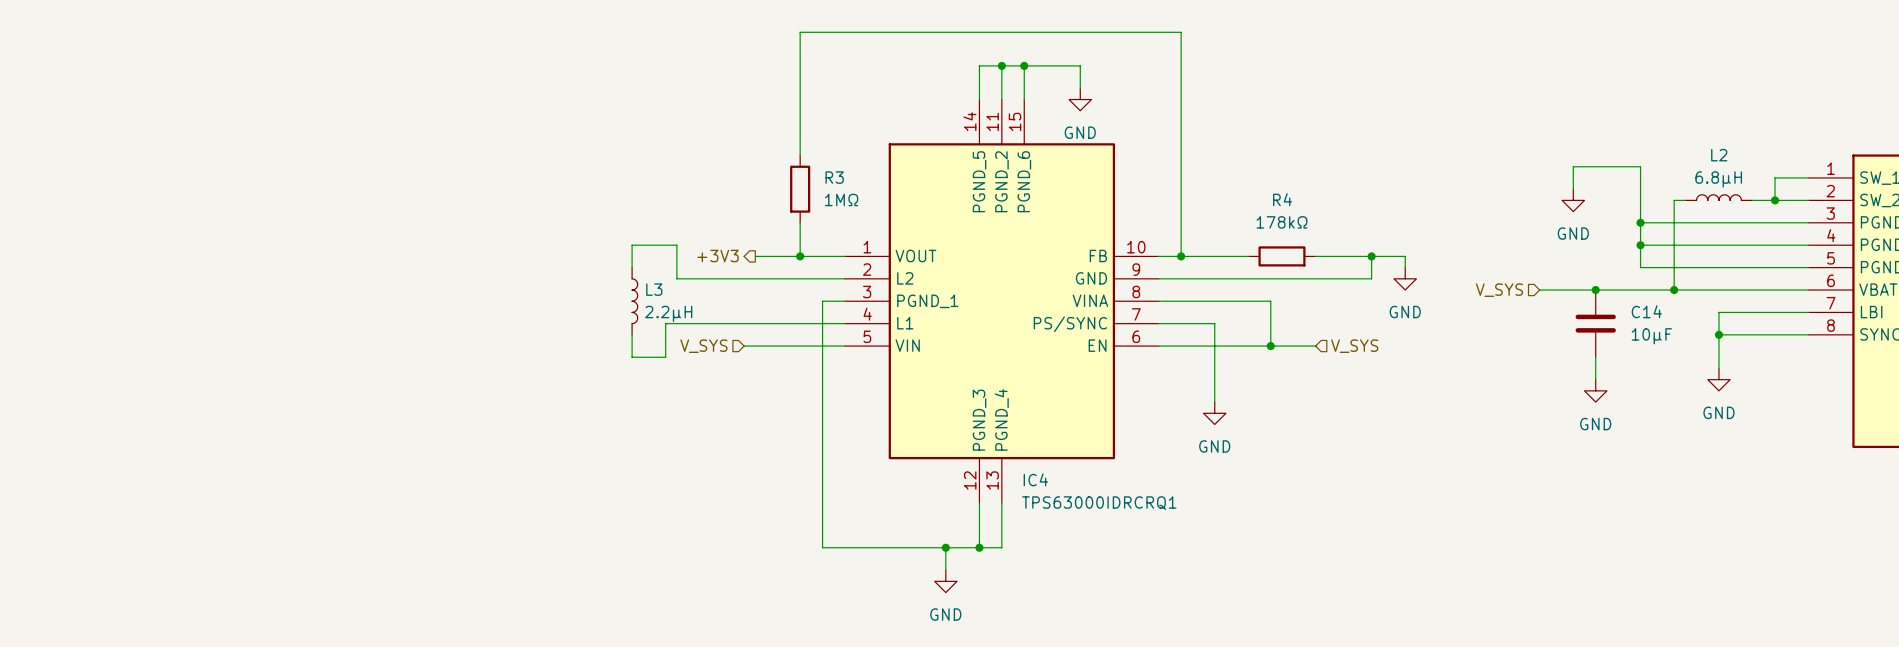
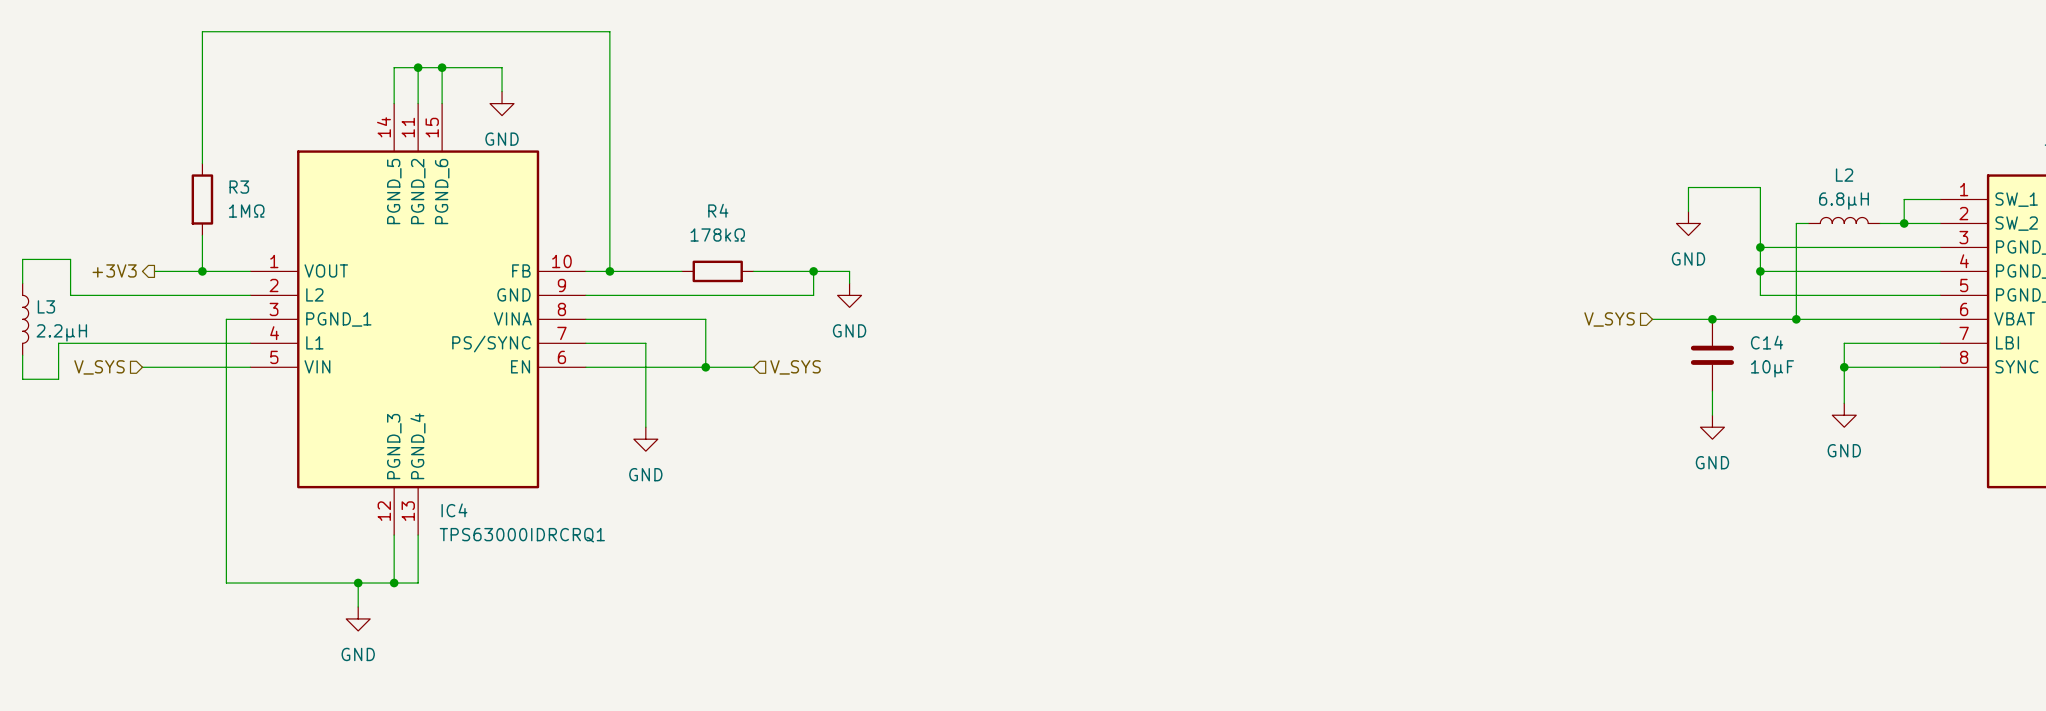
wire: none -> (418, 67) (418, 103)
junction: none -> (418, 67)
wire: none -> (442, 67) (442, 103)
junction: none -> (442, 67)
wire: (1001, 65) (1001, 99) -> none
junction: (1001, 65) -> none
wire: (1024, 65) (1024, 99) -> none
junction: (1024, 65) -> none
wire: none -> (502, 91) (502, 67) (394, 67) (394, 103)
power symbol: none -> GND (502, 103)
wire: (1080, 88) (1080, 65) (979, 65) (979, 99) -> none
power symbol: GND (1080, 99) -> none
wire: none -> (202, 163) (202, 31) (609, 31) (609, 271)
wire: (800, 155) (800, 32) (1181, 32) (1181, 256) -> none
R3 position: (800, 189) -> (202, 199)
wire: none -> (202, 235) (202, 271)
wire: (800, 222) (800, 256) -> none
hierarchical label: none -> +3V3 (114, 270)
wire: none -> (154, 271) (250, 271)
junction: none -> (202, 271)
junction: none -> (609, 271)
wire: none -> (753, 271) (849, 271) (849, 283)
wire: none -> (813, 271) (813, 295) (585, 295)
hierarchical label: +3V3 (718, 255) -> none
wire: none -> (22, 283) (22, 259) (70, 259) (70, 295) (250, 295)
wire: (755, 256) (844, 256) -> (585, 271) (681, 271)
junction position: (800, 256) -> (813, 271)
wire: (1158, 256) (1248, 256) -> none
junction: (1181, 256) -> none
R4 position: (1281, 256) -> (717, 271)
wire: (1315, 256) (1405, 256) (1405, 267) -> none
wire: (1371, 256) (1371, 278) (1158, 278) -> none
junction: (1371, 256) -> none
wire: (632, 267) (632, 245) (676, 245) (676, 278) (844, 278) -> none
power symbol: none -> GND (849, 295)
power symbol: GND (1405, 278) -> none
wire: none -> (250, 319) (226, 319) (226, 583) (418, 583) (418, 535)
wire: none -> (585, 319) (705, 319) (705, 367)
L3 position: (634, 301) -> (25, 319)
wire: (844, 301) (822, 301) (822, 547) (1001, 547) (1001, 502) -> none
IC4 position: (1001, 301) -> (418, 319)
wire: (1158, 301) (1270, 301) (1270, 346) -> none
wire: none -> (250, 343) (58, 343) (58, 379) (22, 379) (22, 355)
wire: none -> (585, 343) (645, 343) (645, 427)
wire: (844, 323) (665, 323) (665, 357) (632, 357) (632, 334) -> none
wire: (1158, 323) (1214, 323) (1214, 402) -> none
hierarchical label: none -> V_SYS (99, 367)
wire: none -> (142, 367) (250, 367)
wire: none -> (585, 367) (753, 367)
junction: none -> (705, 367)
hierarchical label rotation: 0° (703, 346) -> 180° (795, 367)
wire: (744, 346) (844, 346) -> none
wire: (1158, 346) (1315, 346) -> none
junction: (1270, 346) -> none
hierarchical label: V_SYS (1354, 346) -> none
power symbol: none -> GND (645, 439)
power symbol: GND (1214, 413) -> none
wire: none -> (394, 535) (394, 583)
wire: (979, 502) (979, 547) -> none
wire: none -> (358, 583) (358, 606)
junction: none -> (358, 583)
junction: none -> (394, 583)
wire: (945, 547) (945, 570) -> none
junction: (945, 547) -> none
junction: (979, 547) -> none
power symbol: none -> GND (358, 618)
power symbol: GND (945, 581) -> none

